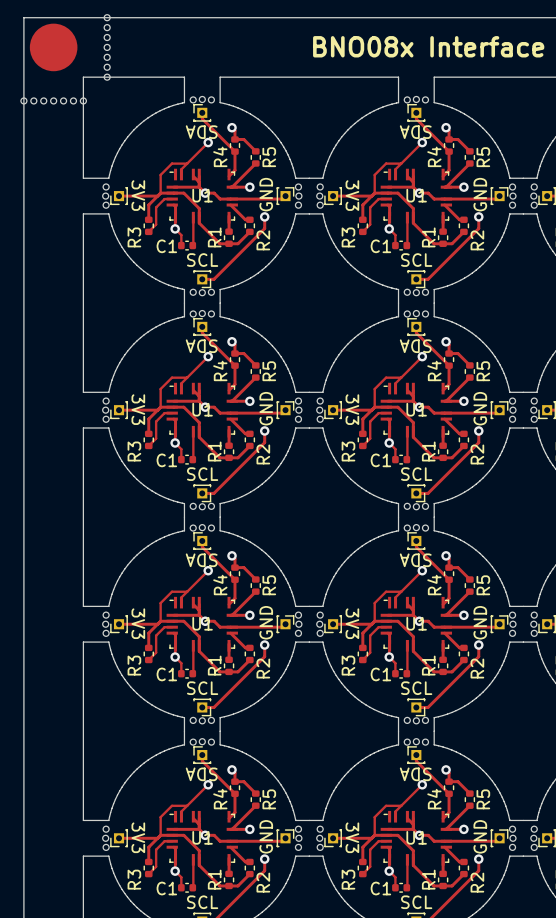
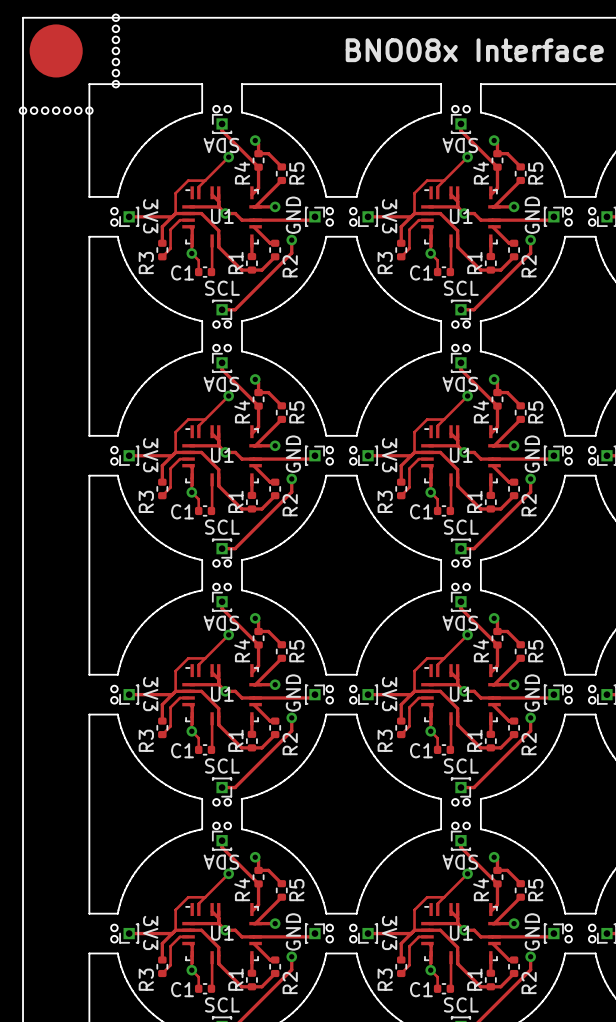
part: (193, 99) -> none
part: none -> (216, 109)
part: (202, 99) -> none
part: none -> (227, 109)
part: (211, 99) -> none
part: (407, 99) -> none
part: none -> (455, 109)
part: (416, 99) -> none
part: none -> (466, 109)
part: (425, 99) -> none
part: (106, 186) -> none
part: (320, 186) -> none
part: (534, 186) -> none
part: (298, 187) -> none
part: (512, 187) -> none
part: none -> (114, 211)
part: none -> (329, 211)
part: none -> (353, 211)
part: none -> (568, 211)
part: none -> (592, 211)
part: (105, 196) -> none
part: (298, 196) -> none
part: (319, 196) -> none
part: (512, 196) -> none
part: (533, 196) -> none
part: none -> (114, 222)
part: none -> (329, 222)
part: none -> (353, 222)
part: none -> (568, 222)
part: none -> (592, 222)
part: (106, 205) -> none
part: (298, 205) -> none
part: (320, 205) -> none
part: (512, 205) -> none
part: (534, 205) -> none
part: (193, 292) -> none
part: none -> (216, 324)
part: (202, 292) -> none
part: none -> (227, 324)
part: (211, 292) -> none
part: (407, 292) -> none
part: none -> (455, 324)
part: (416, 292) -> none
part: none -> (466, 324)
part: (425, 292) -> none
part: (193, 313) -> none
part: none -> (216, 348)
part: (202, 313) -> none
part: none -> (227, 348)
part: (211, 313) -> none
part: (407, 313) -> none
part: none -> (455, 348)
part: (416, 313) -> none
part: none -> (466, 348)
part: (425, 313) -> none
part: (106, 401) -> none
part: (298, 401) -> none
part: (320, 401) -> none
part: (512, 401) -> none
part: (534, 401) -> none
part: none -> (114, 450)
part: none -> (329, 450)
part: none -> (353, 450)
part: none -> (568, 450)
part: none -> (592, 450)
part: (105, 410) -> none
part: (298, 410) -> none
part: (319, 410) -> none
part: (512, 410) -> none
part: (533, 410) -> none
part: none -> (114, 461)
part: none -> (329, 461)
part: none -> (353, 461)
part: none -> (568, 461)
part: none -> (592, 461)
part: (106, 419) -> none
part: (298, 419) -> none
part: (320, 419) -> none
part: (512, 419) -> none
part: (534, 419) -> none
part: (193, 506) -> none
part: none -> (216, 563)
part: (202, 506) -> none
part: none -> (227, 563)
part: (211, 506) -> none
part: (407, 506) -> none
part: none -> (455, 563)
part: (416, 506) -> none
part: none -> (466, 563)
part: (425, 506) -> none
part: none -> (216, 586)
part: (202, 527) -> none
part: none -> (227, 587)
part: none -> (455, 586)
part: (416, 527) -> none
part: none -> (466, 587)
part: (193, 528) -> none
part: (211, 528) -> none
part: (407, 528) -> none
part: (425, 528) -> none
part: (106, 615) -> none
part: (298, 615) -> none
part: (320, 615) -> none
part: (512, 615) -> none
part: (534, 615) -> none
part: none -> (114, 689)
part: none -> (329, 689)
part: none -> (353, 689)
part: none -> (568, 689)
part: none -> (592, 689)
part: (105, 624) -> none
part: (298, 624) -> none
part: (319, 624) -> none
part: (512, 624) -> none
part: (533, 624) -> none
part: none -> (114, 700)
part: none -> (329, 700)
part: none -> (353, 700)
part: none -> (568, 700)
part: none -> (592, 700)
part: (106, 633) -> none
part: (298, 633) -> none
part: (320, 633) -> none
part: (512, 633) -> none
part: (534, 633) -> none
part: (193, 720) -> none
part: none -> (216, 802)
part: (202, 720) -> none
part: none -> (227, 802)
part: (211, 720) -> none
part: (407, 720) -> none
part: none -> (455, 802)
part: (416, 720) -> none
part: none -> (466, 802)
part: (425, 720) -> none
part: none -> (216, 825)
part: (202, 741) -> none
part: none -> (227, 825)
part: none -> (455, 825)
part: (416, 741) -> none
part: none -> (466, 825)
part: (193, 742) -> none
part: (211, 742) -> none
part: (407, 742) -> none
part: (425, 742) -> none
part: (106, 829) -> none
part: (298, 829) -> none
part: (320, 829) -> none
part: (512, 829) -> none
part: (534, 829) -> none
part: none -> (114, 927)
part: none -> (329, 927)
part: none -> (353, 927)
part: none -> (568, 927)
part: none -> (592, 927)
part: (105, 838) -> none
part: (298, 838) -> none
part: (319, 838) -> none
part: (512, 838) -> none
part: (533, 838) -> none
part: none -> (114, 939)
part: none -> (329, 939)
part: none -> (353, 939)
part: none -> (568, 939)
part: none -> (592, 939)
part: (106, 847) -> none
part: (298, 847) -> none
part: (320, 847) -> none
part: (512, 847) -> none
part: (534, 847) -> none

